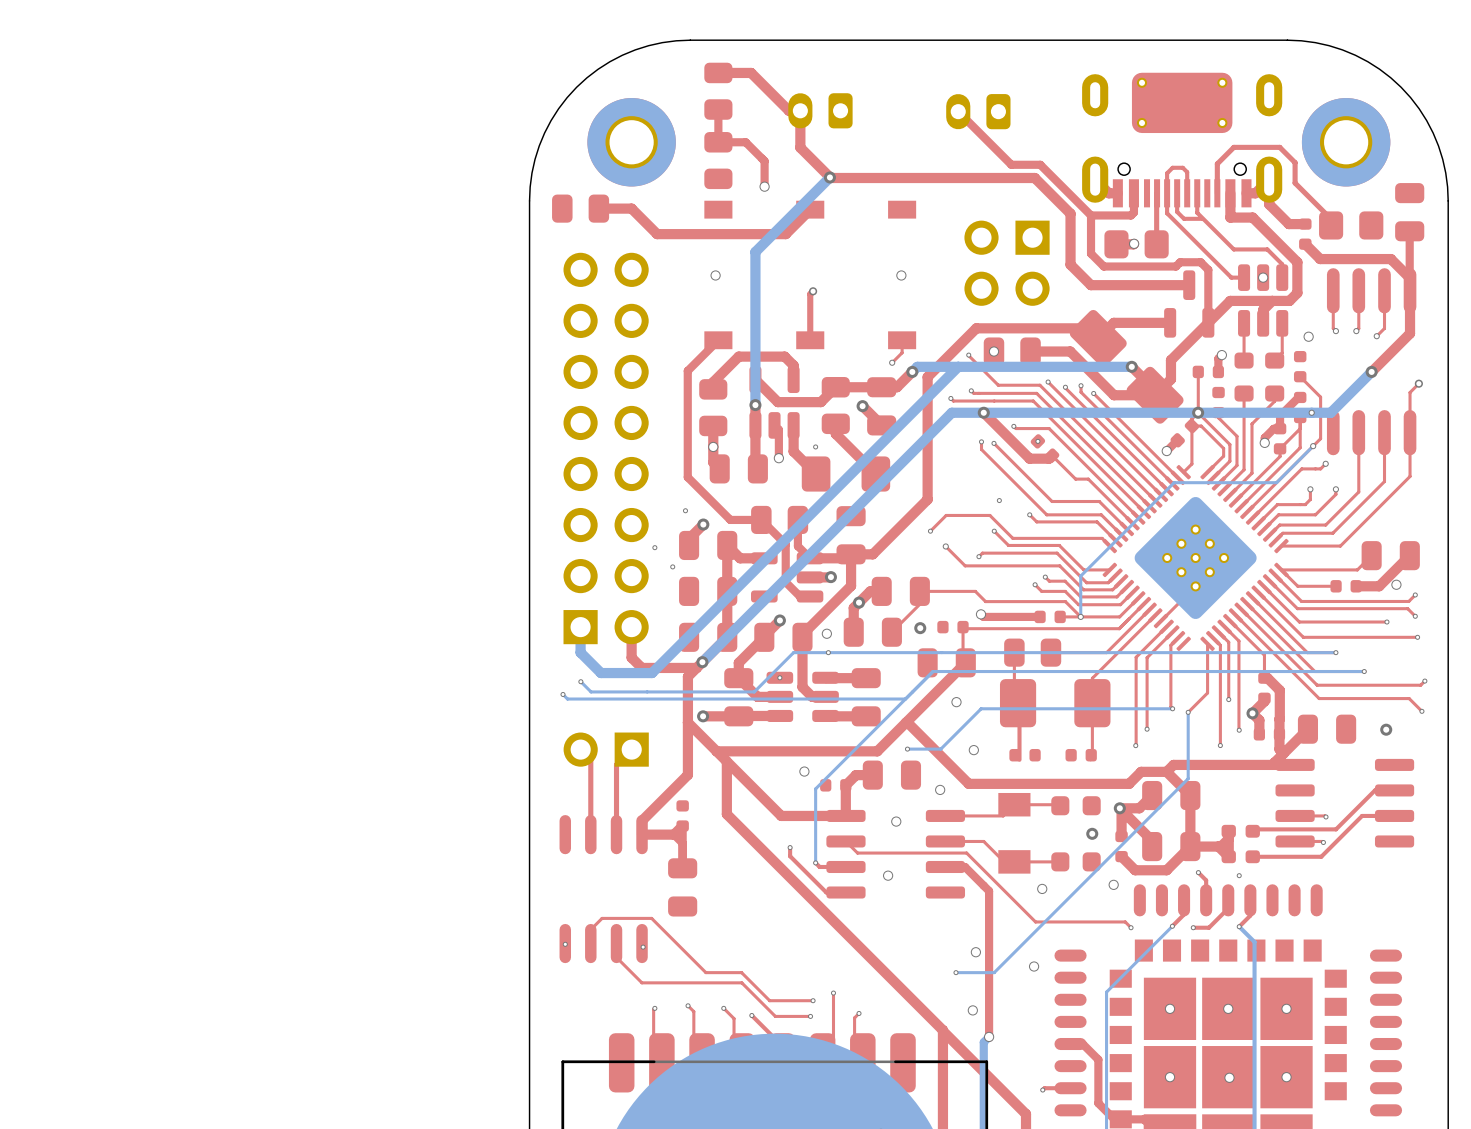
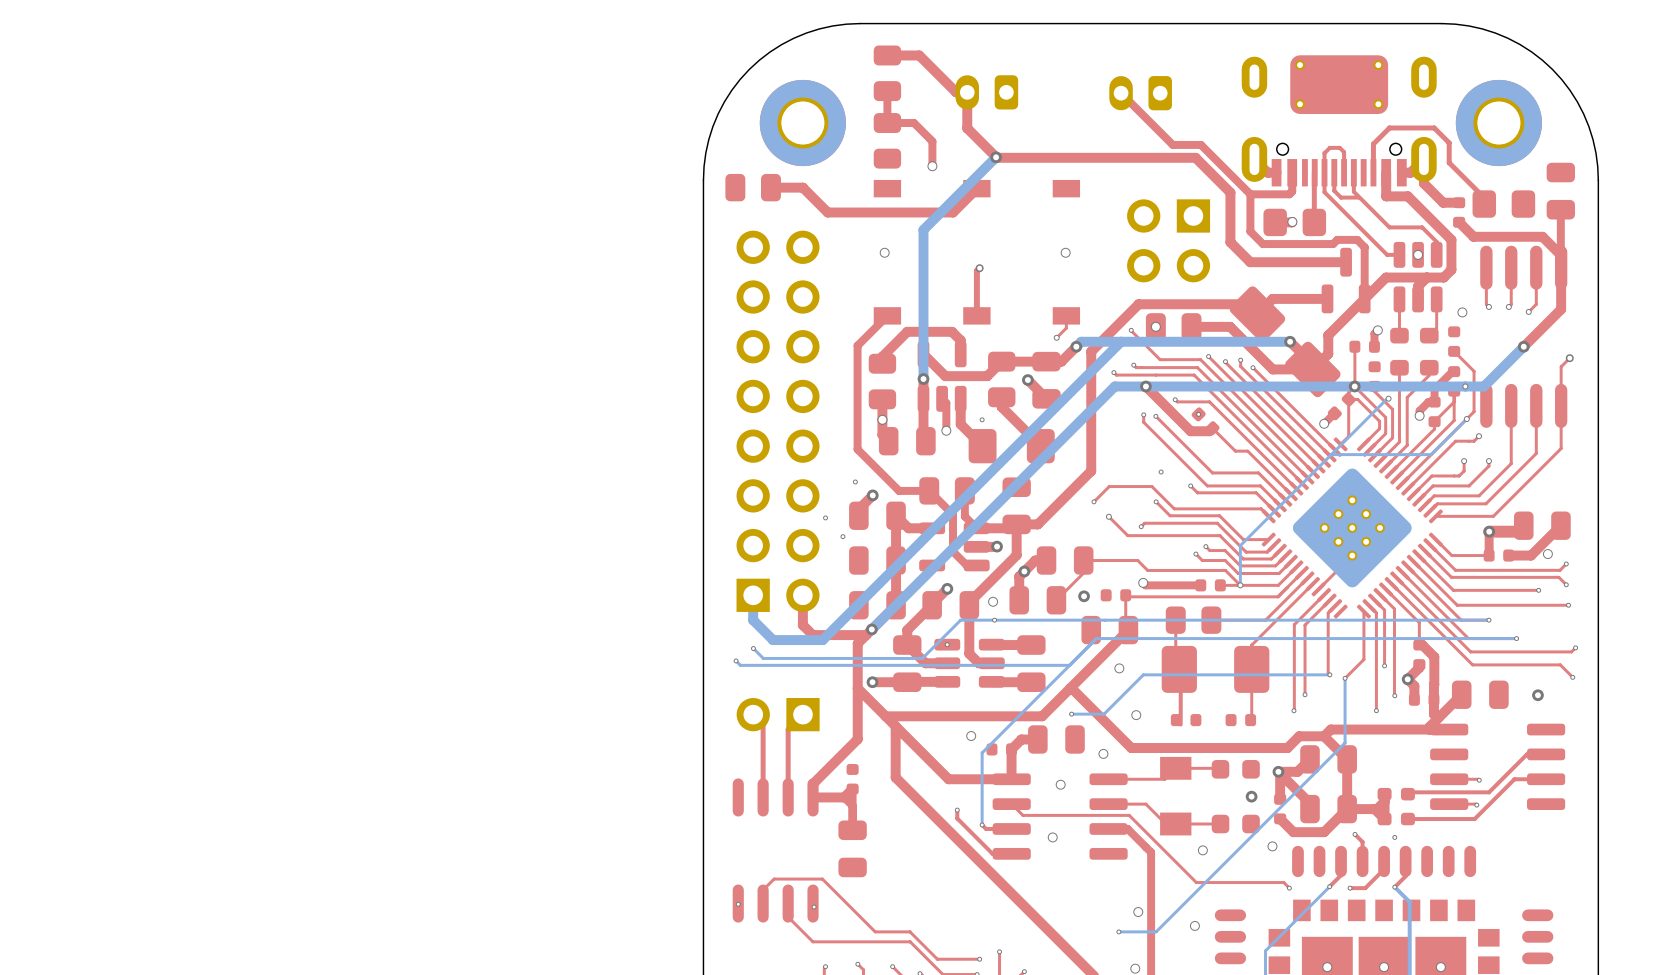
bottom track: none -> (1388, 398) (1331, 454)
via: none -> (1388, 398)
top track: none -> (1489, 531) (1489, 555)
via: none -> (1489, 531)
top track: (1365, 561) (1357, 569) (1281, 569) -> (1517, 531) (1489, 531)

